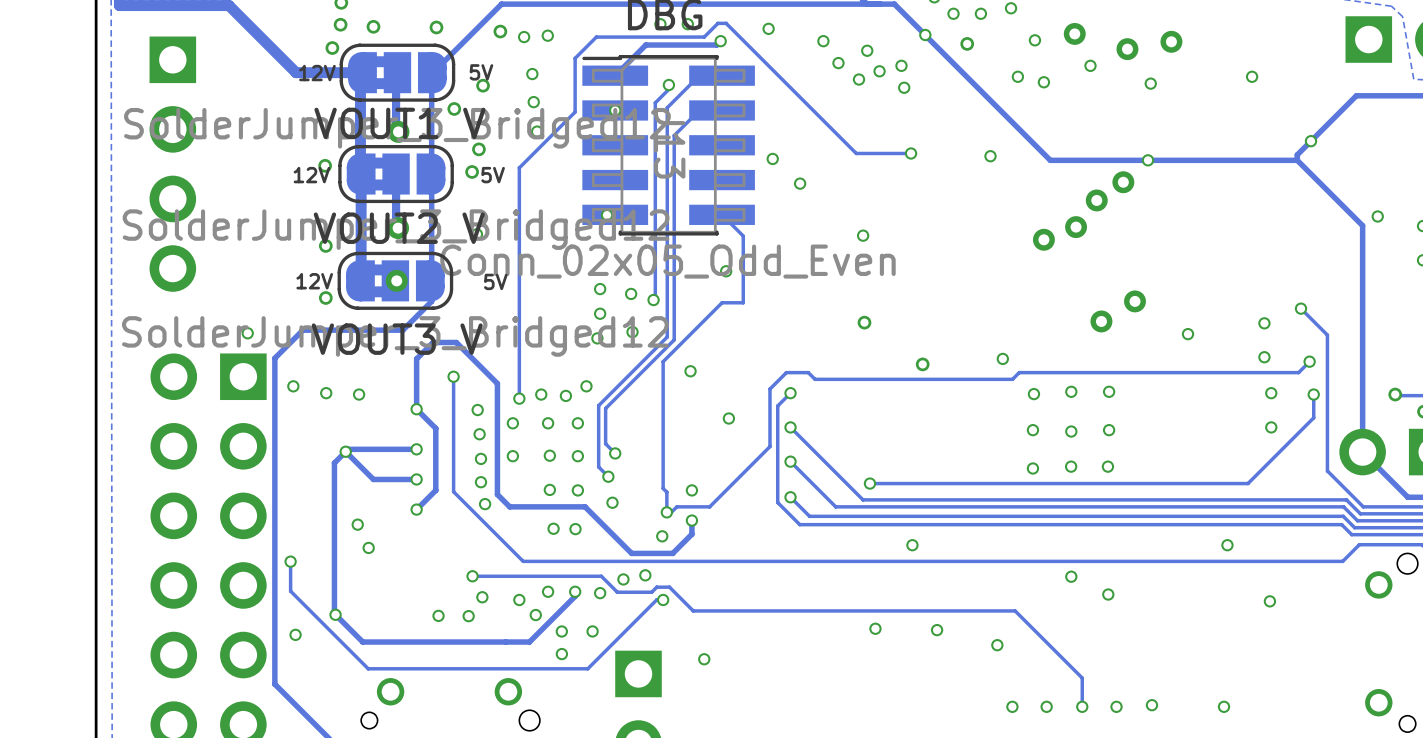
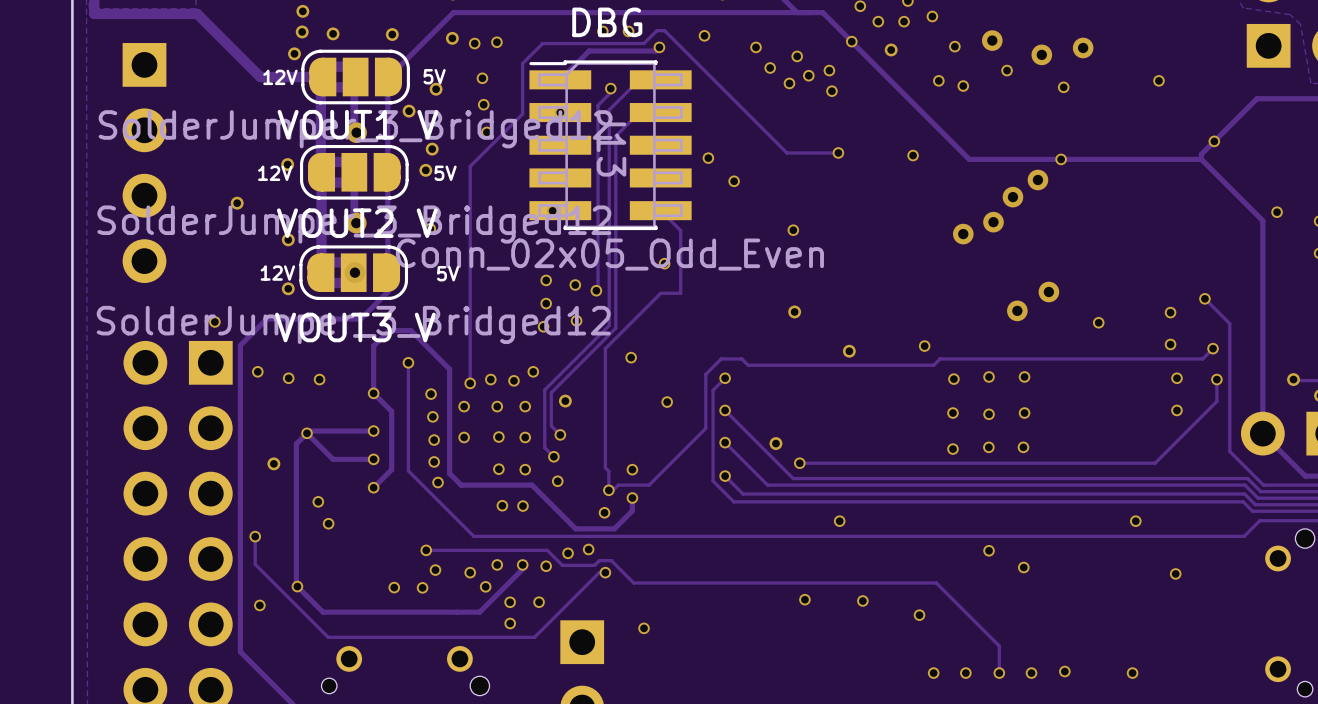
via: none -> (237, 203)
via: none -> (565, 401)
via: none -> (775, 443)
via: none -> (273, 463)

